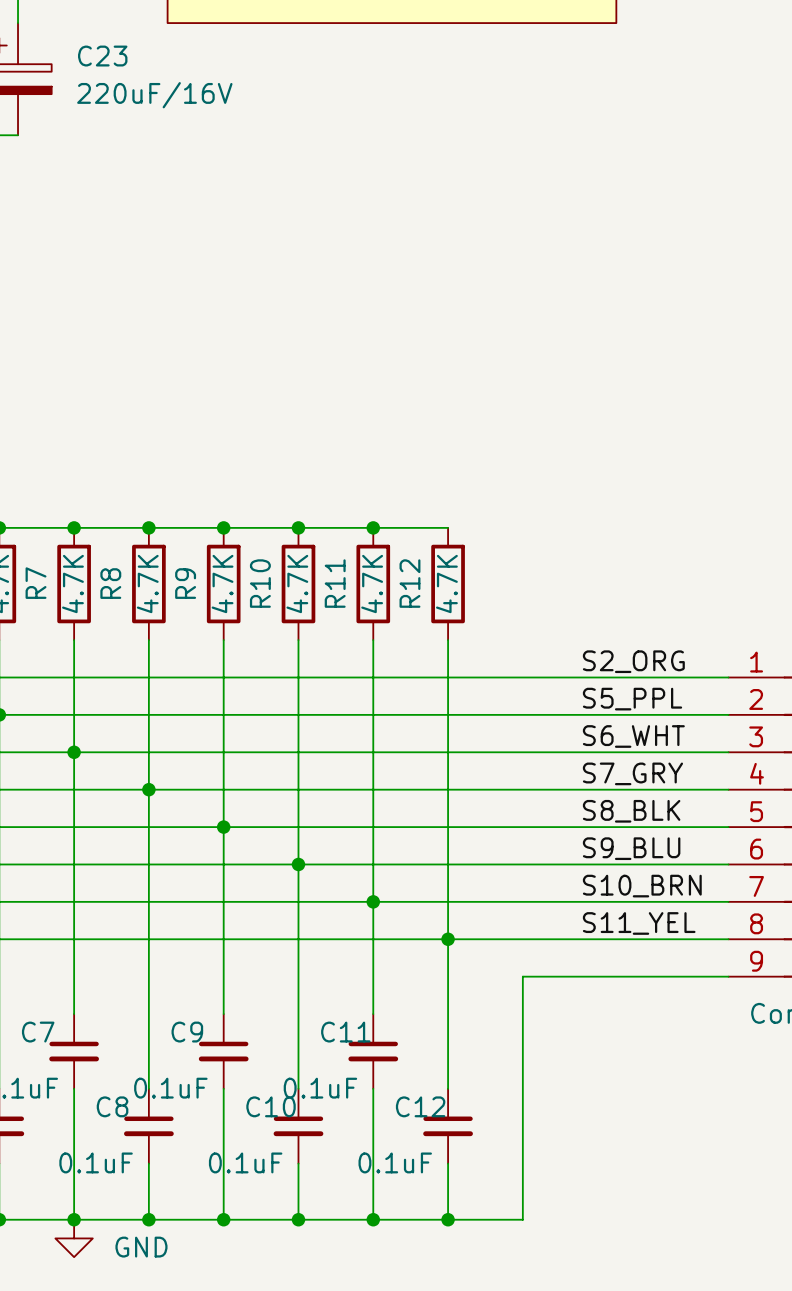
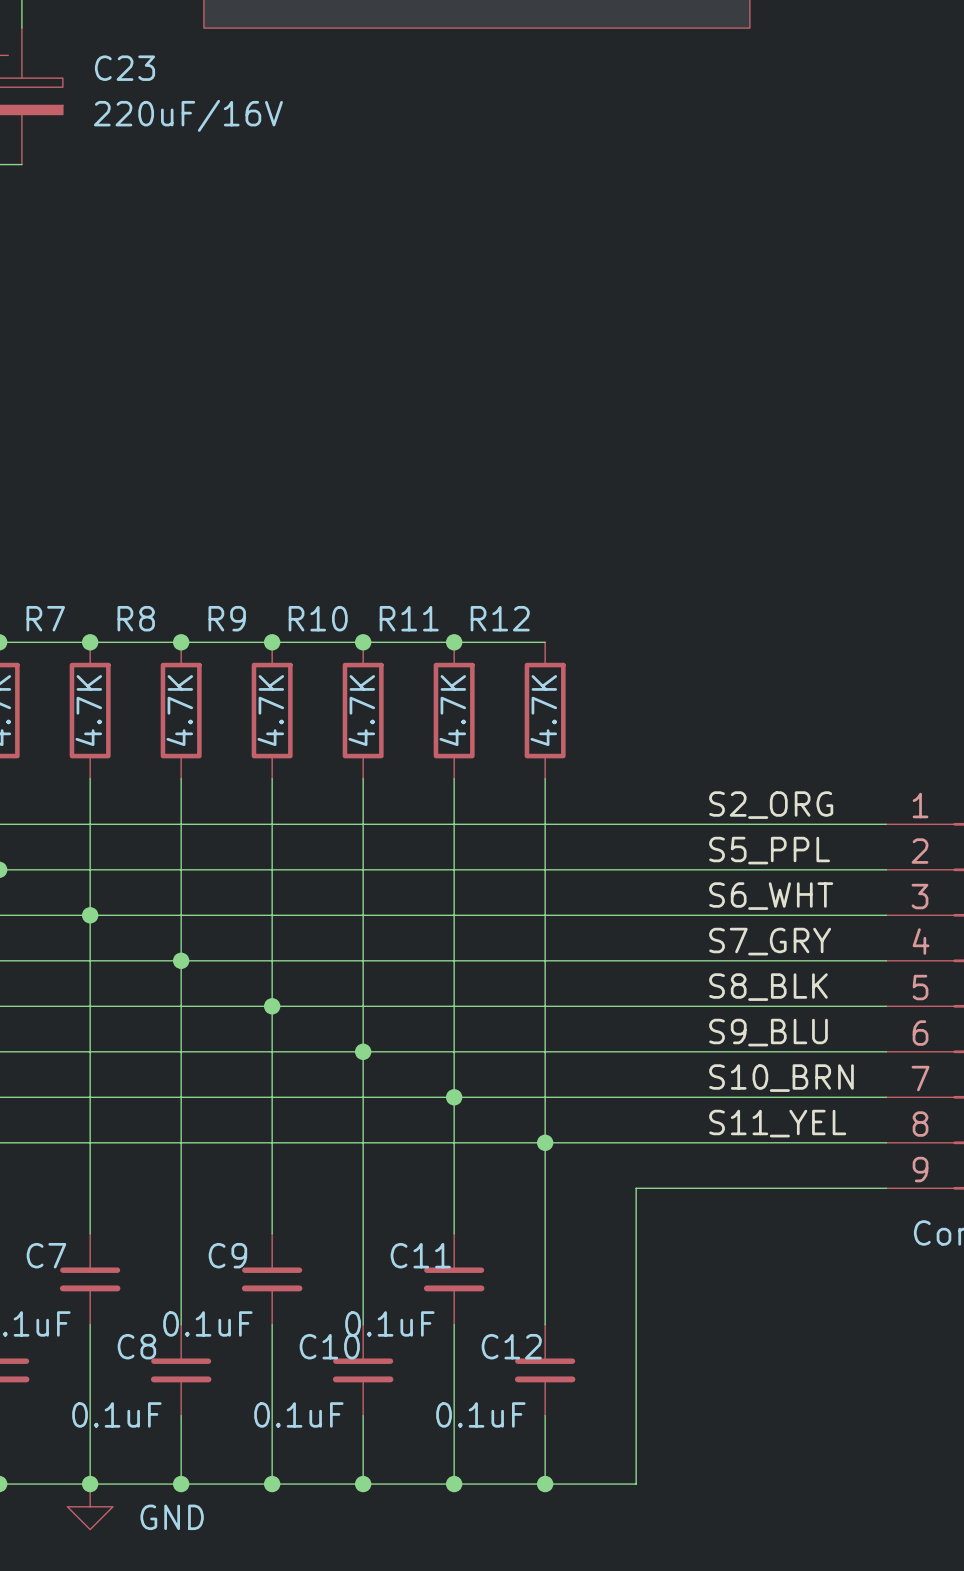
R7 name rotation: 0° (36, 583) -> 90° clockwise (45, 618)
R7 name position: R7 (36, 583) -> R7 (45, 618)
R8 name rotation: 0° (110, 583) -> 90° clockwise (136, 618)
R8 name position: R8 (110, 583) -> R8 (136, 618)
R9 name rotation: 0° (185, 583) -> 90° clockwise (227, 618)
R9 name position: R9 (185, 583) -> R9 (227, 618)
R10 name rotation: 0° (260, 583) -> 90° clockwise (318, 618)
R10 name position: R10 (260, 583) -> R10 (318, 618)
R11 name rotation: 0° (335, 583) -> 90° clockwise (409, 618)
R11 name position: R11 (335, 583) -> R11 (409, 618)
R12 name rotation: 0° (409, 583) -> 90° clockwise (500, 618)
R12 name position: R12 (409, 583) -> R12 (500, 618)

